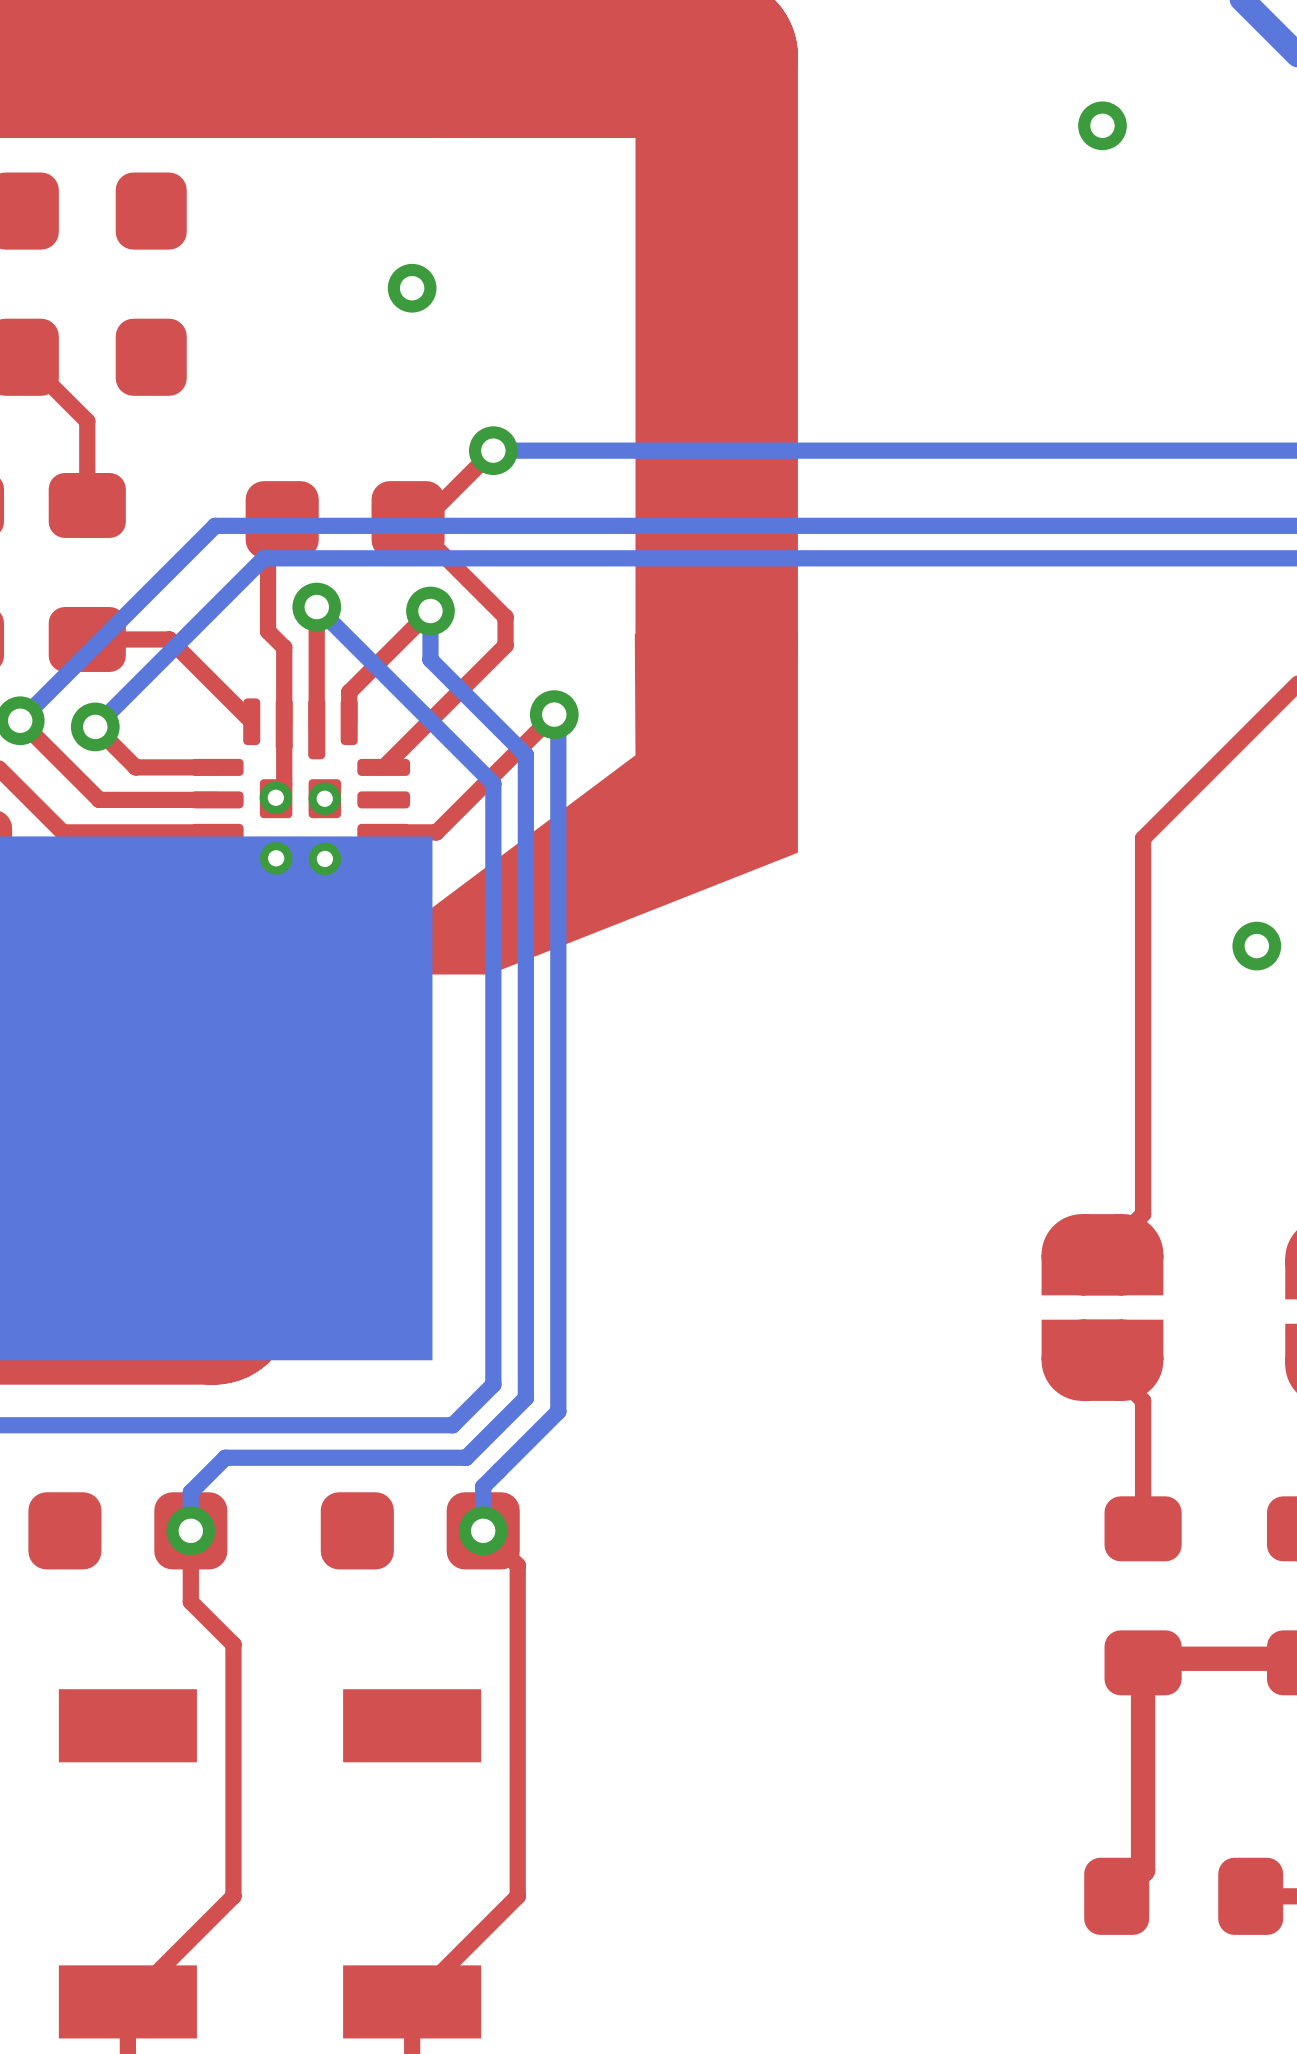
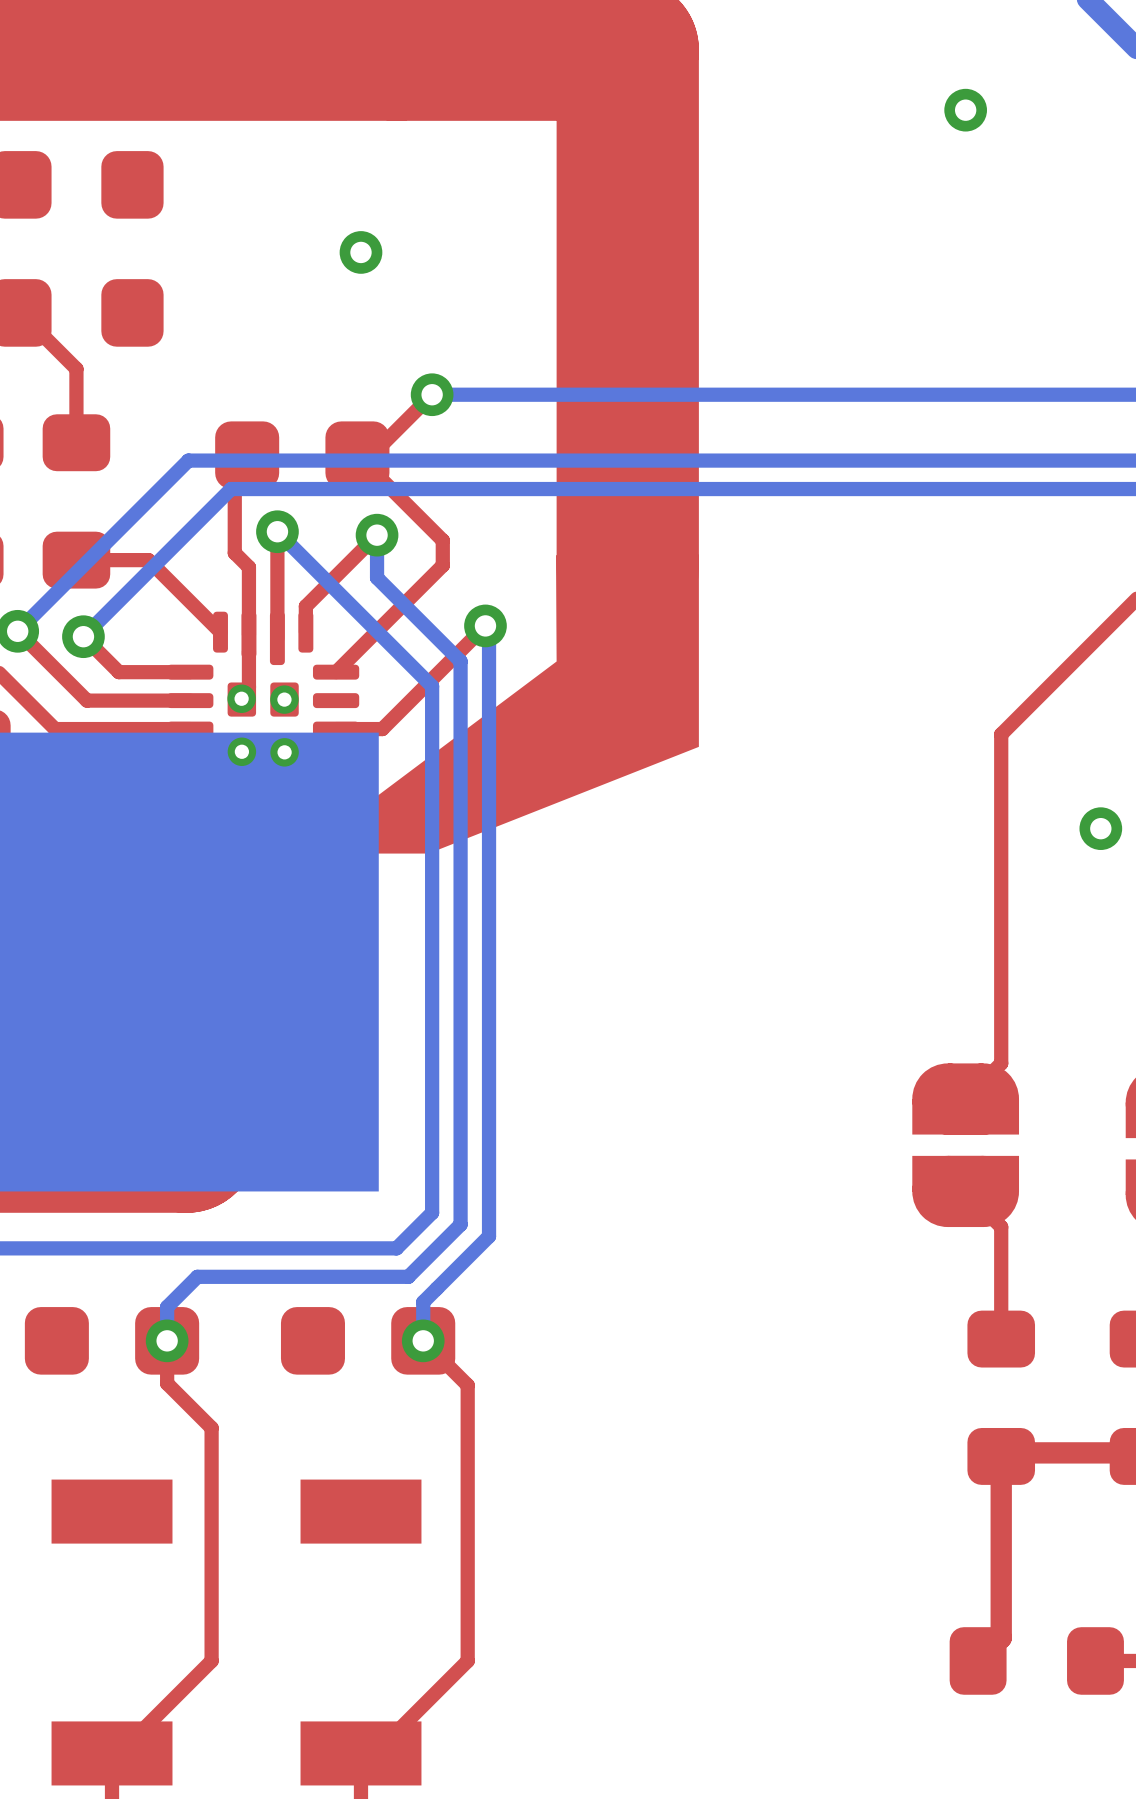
top track: (517, 1565) (517, 1896) (412, 2001) (412, 2018) -> (453, 1371) (467, 1385) (467, 1660) (368, 1760)
top track: (190, 1579) (190, 1601) (233, 1644) (233, 1896) (127, 2001) (127, 2010) -> (167, 1383) (211, 1427) (211, 1660) (112, 1760) (119, 1767)

